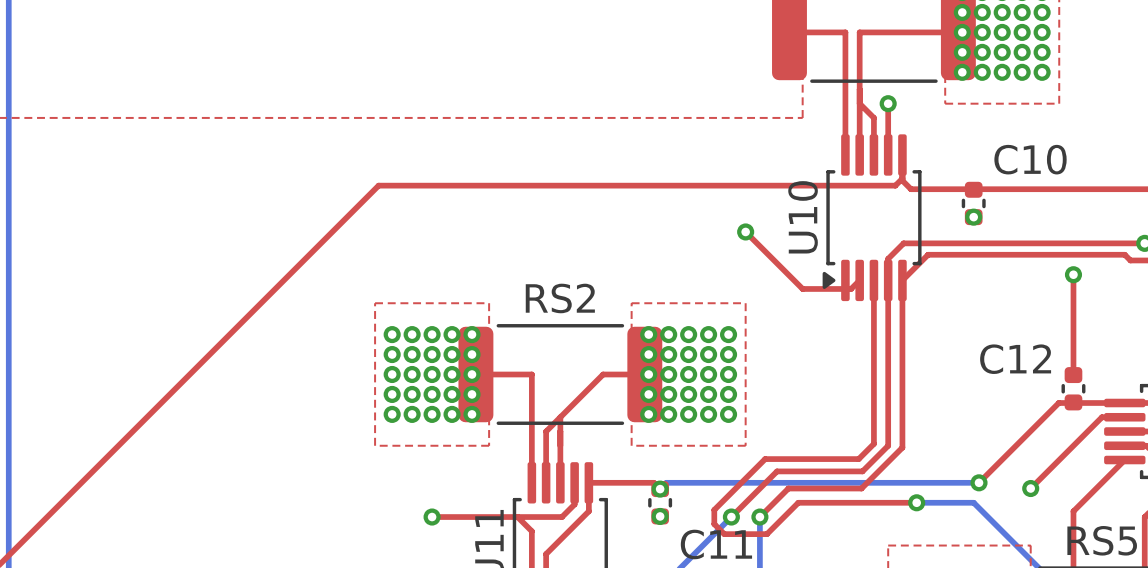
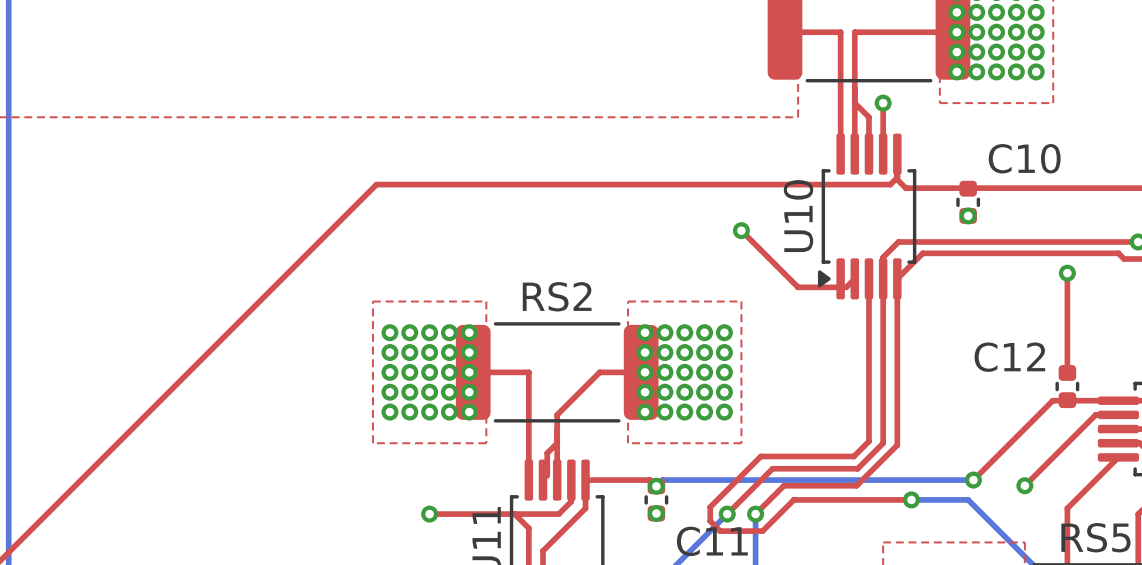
top track: (560, 417) (546, 431) (546, 482) -> none
top track: none -> (557, 443) (547, 453) (547, 475)

